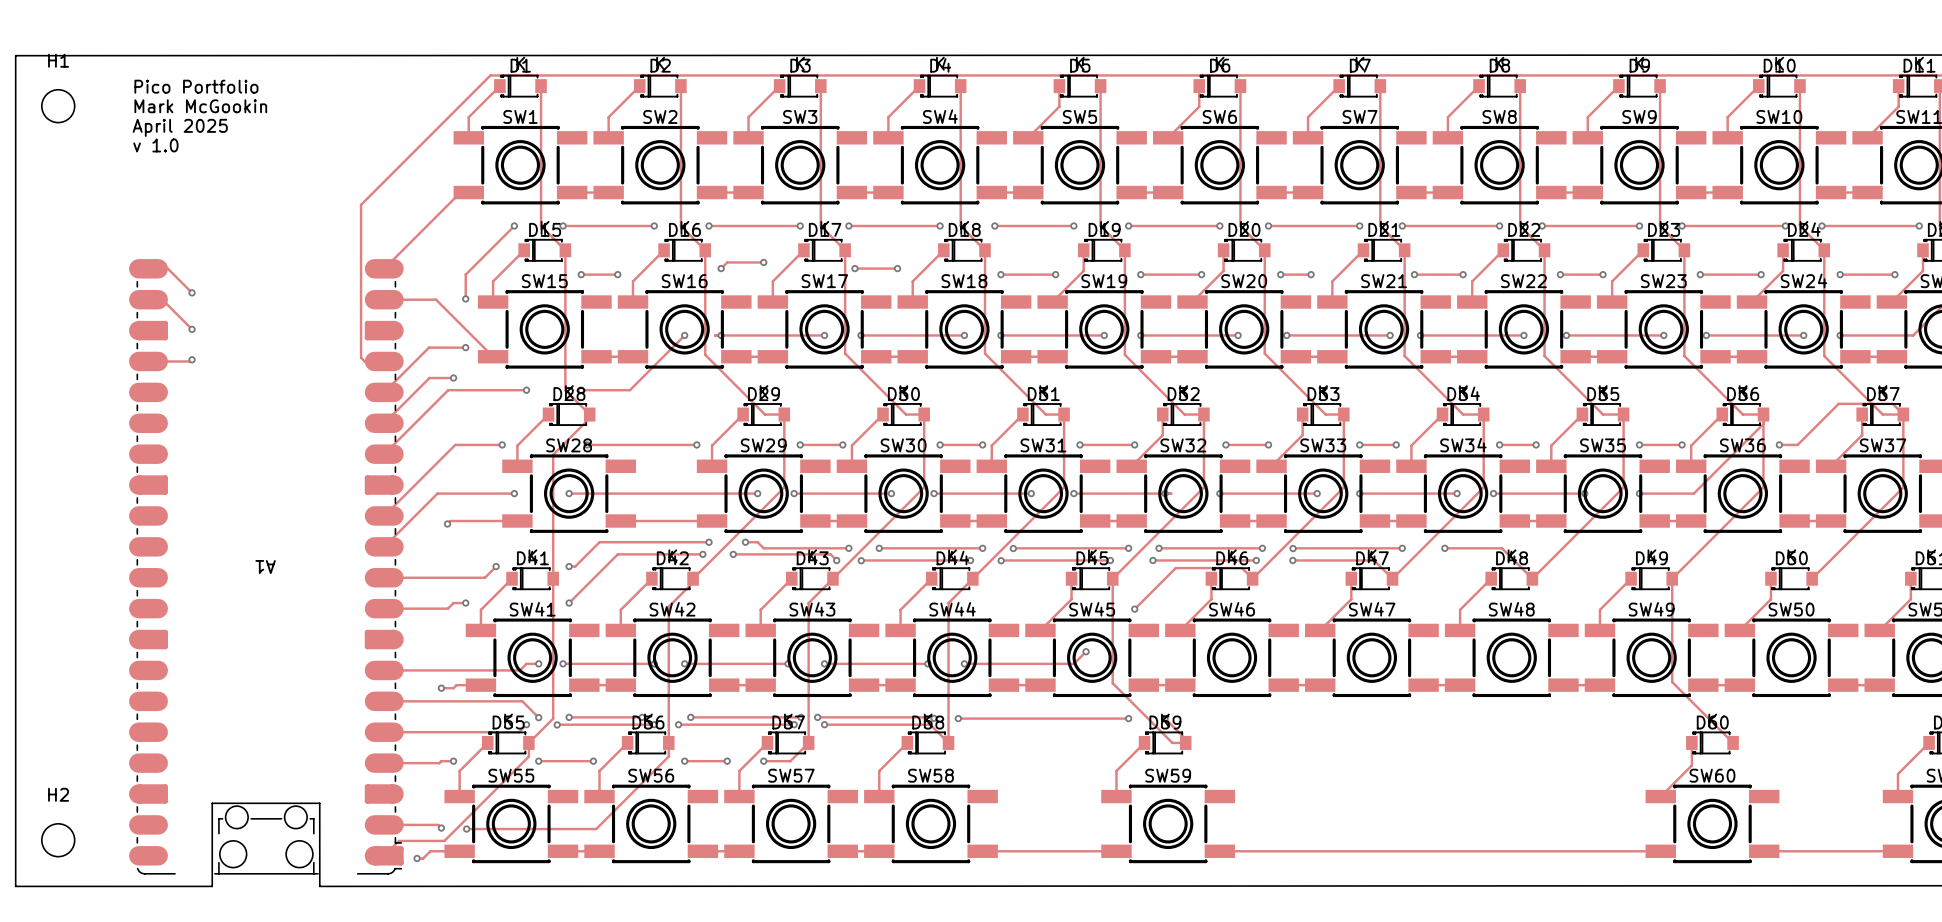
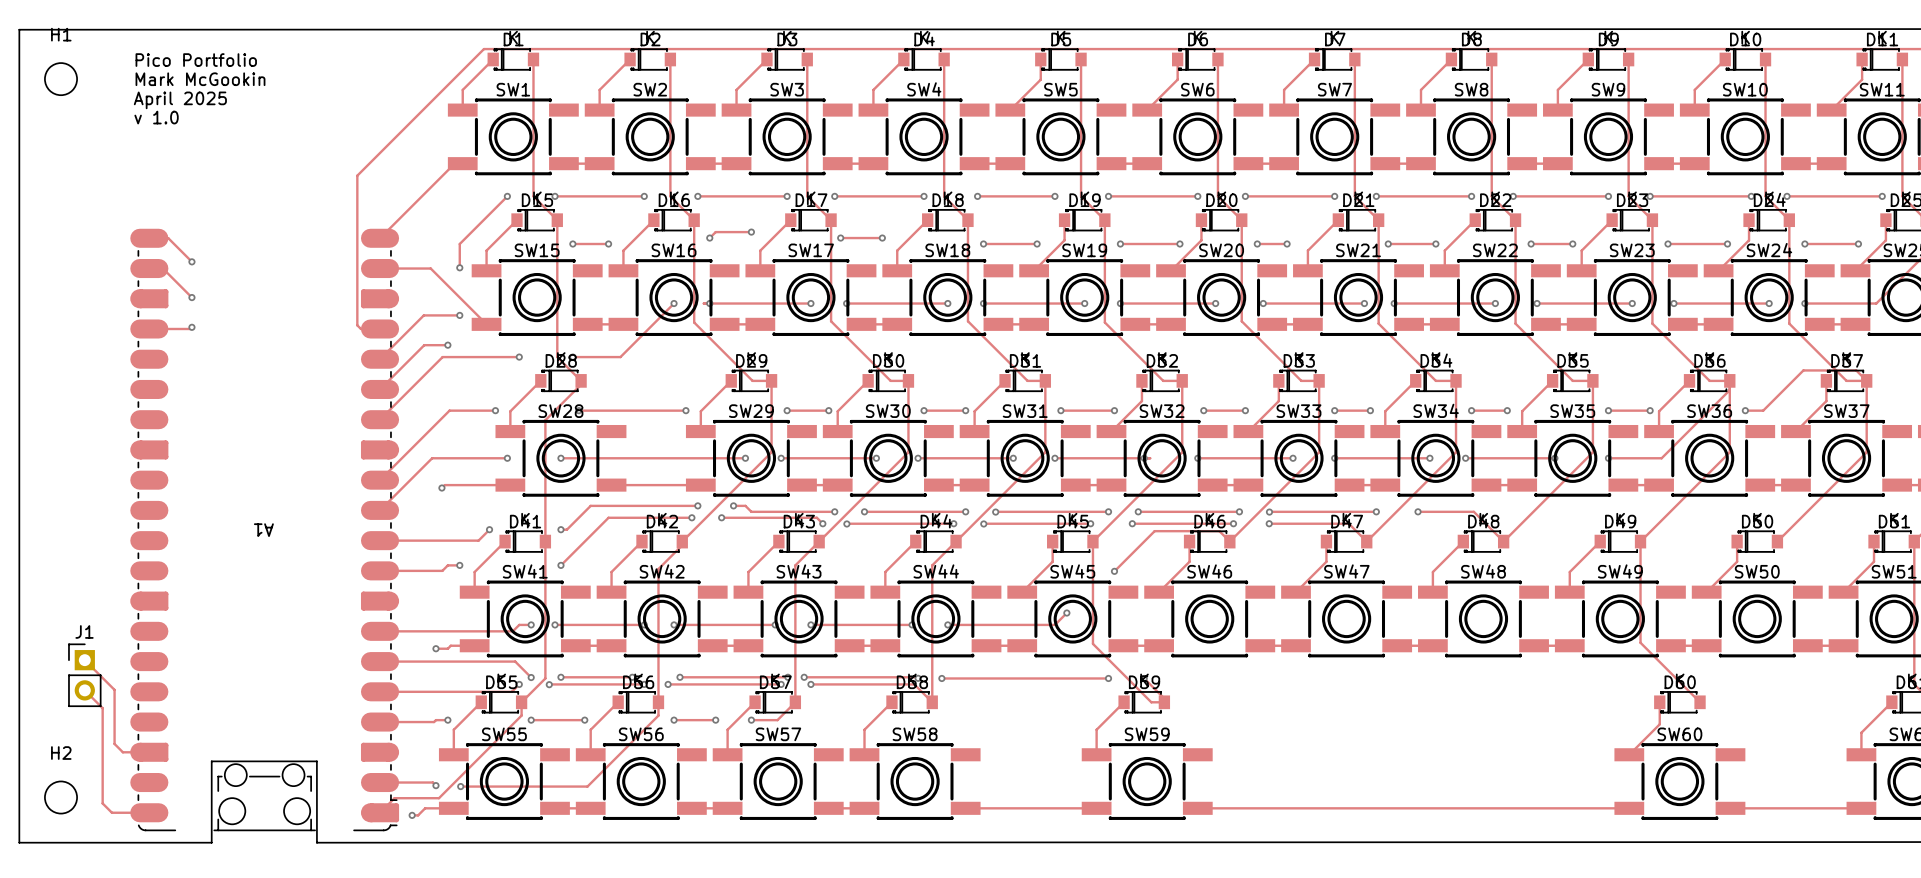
track: none -> (84, 660) (114, 689) (114, 743) (122, 752) (149, 752)
J1: none -> (84, 675)
track: none -> (84, 690) (102, 708) (102, 803) (111, 812) (149, 812)

